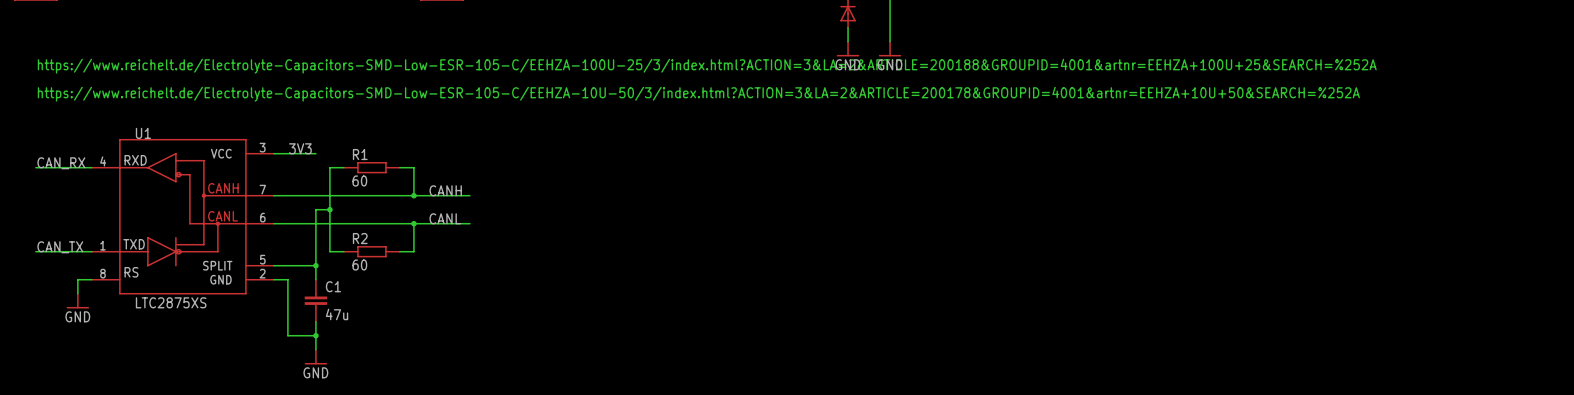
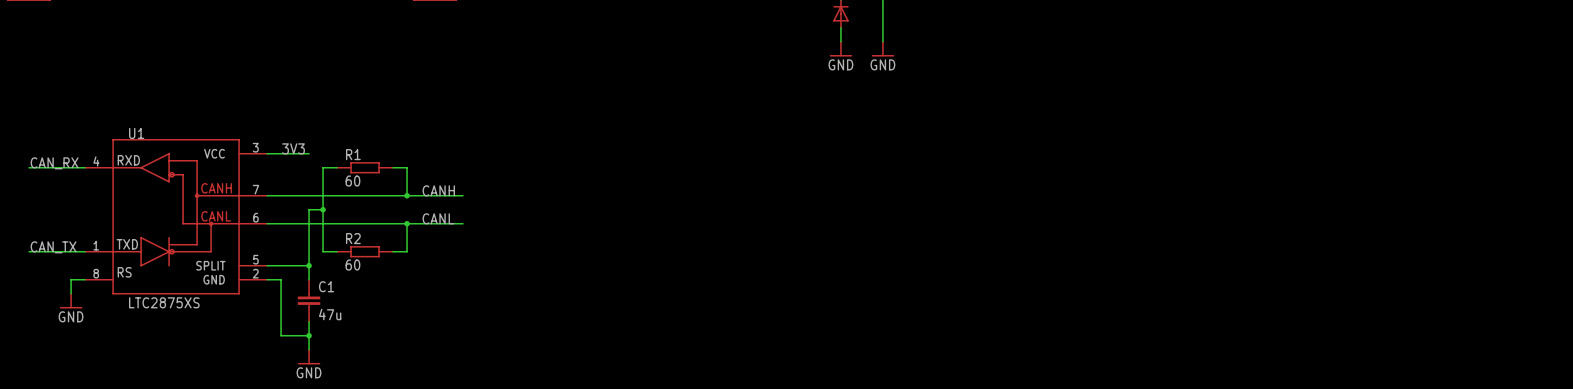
text: https://www.reichelt.de/Electrolyte-Capacitors-SMD-Low-ESR-105-C/EEHZA-100U-25/3/index.html?ACTION=3&LA=2&ARTICLE=200188&GROUPID=4001&artnr=EEHZA+100U+25&SEARCH=%252A (707, 66) -> none
text: https://www.reichelt.de/Electrolyte-Capacitors-SMD-Low-ESR-105-C/EEHZA-10U-50/3/index.html?ACTION=3&LA=2&ARTICLE=200178&GROUPID=4001&artnr=EEHZA+10U+50&SEARCH=%252A (698, 94) -> none

